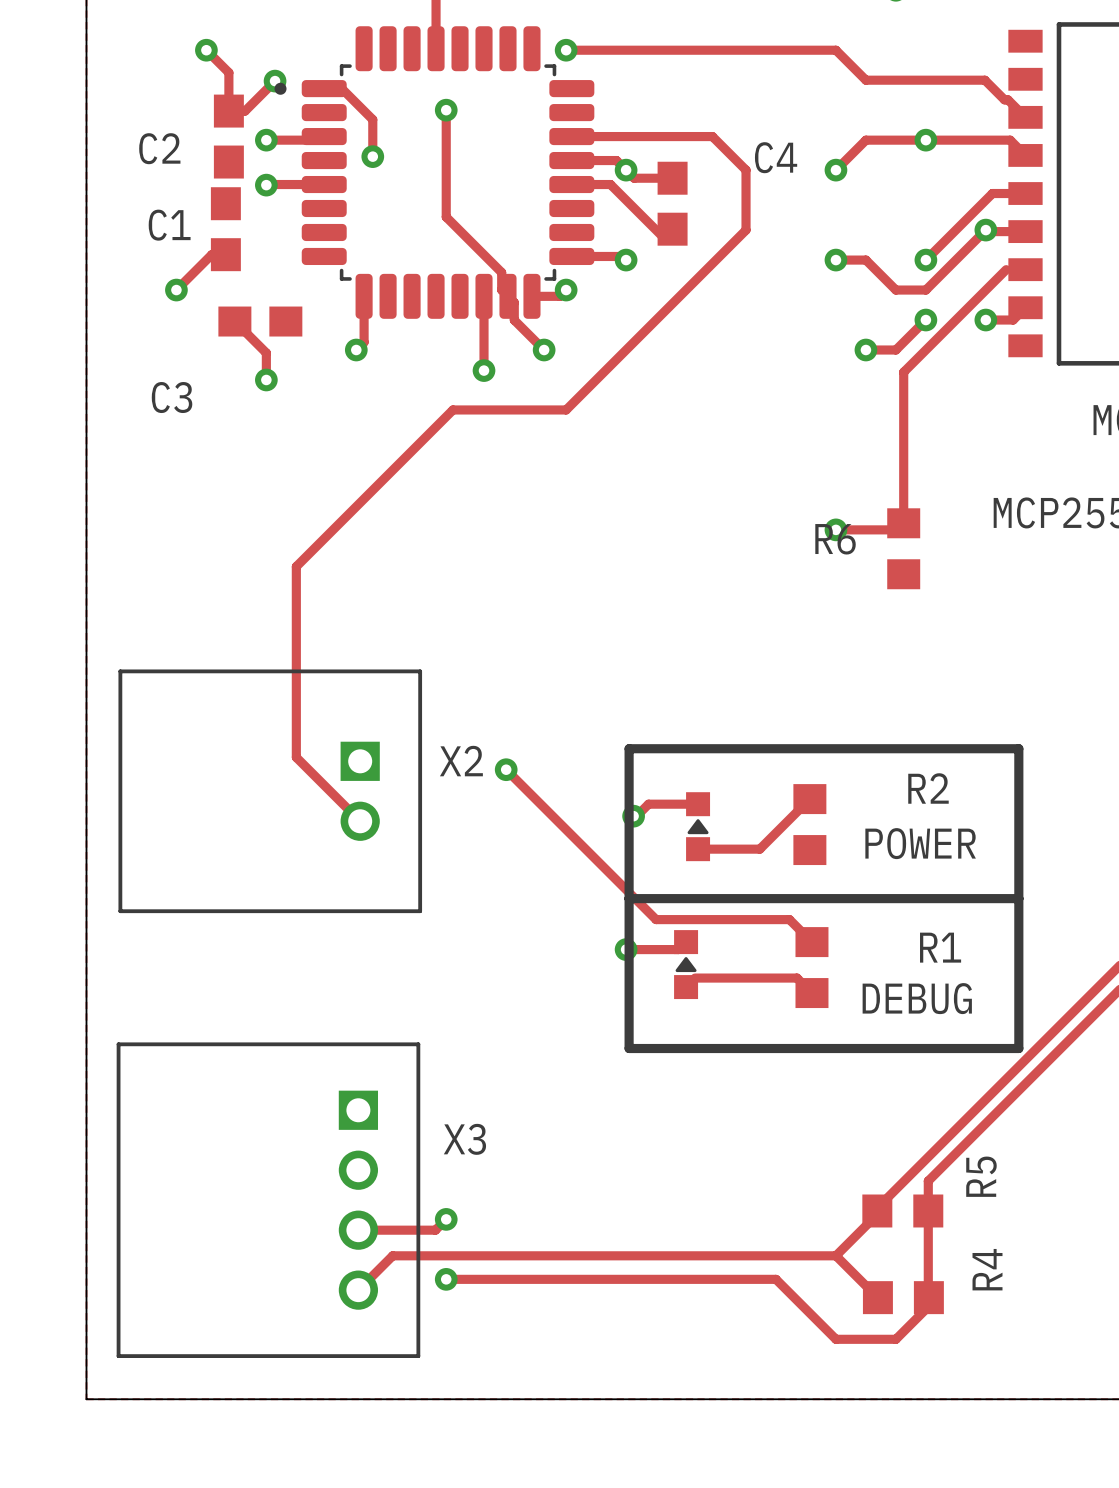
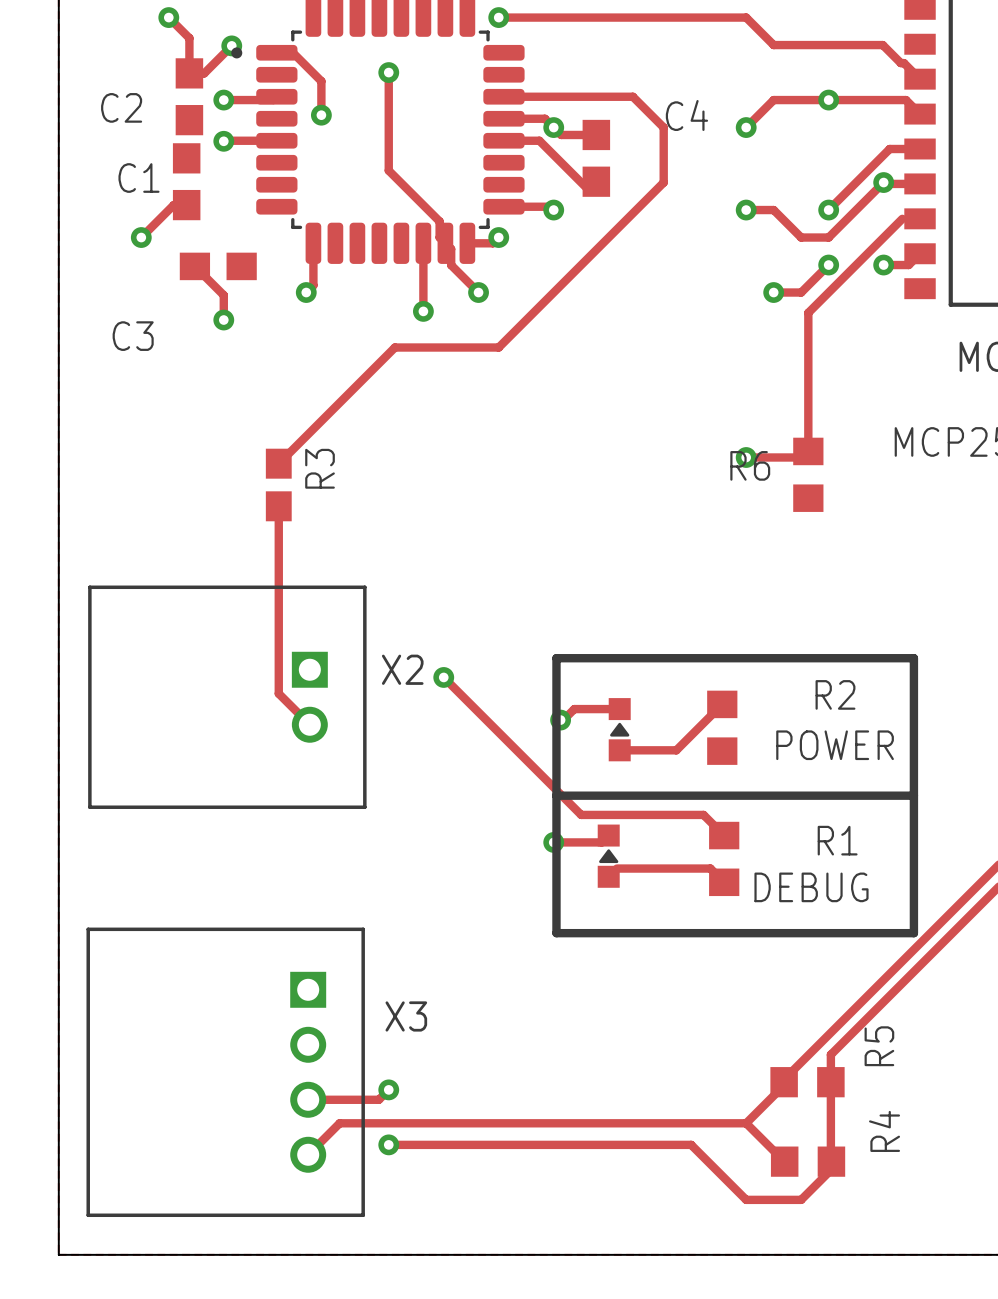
track: (326, 536) (296, 566) (296, 757) (326, 787) -> (278, 506) (278, 693)
R3: none -> (278, 484)

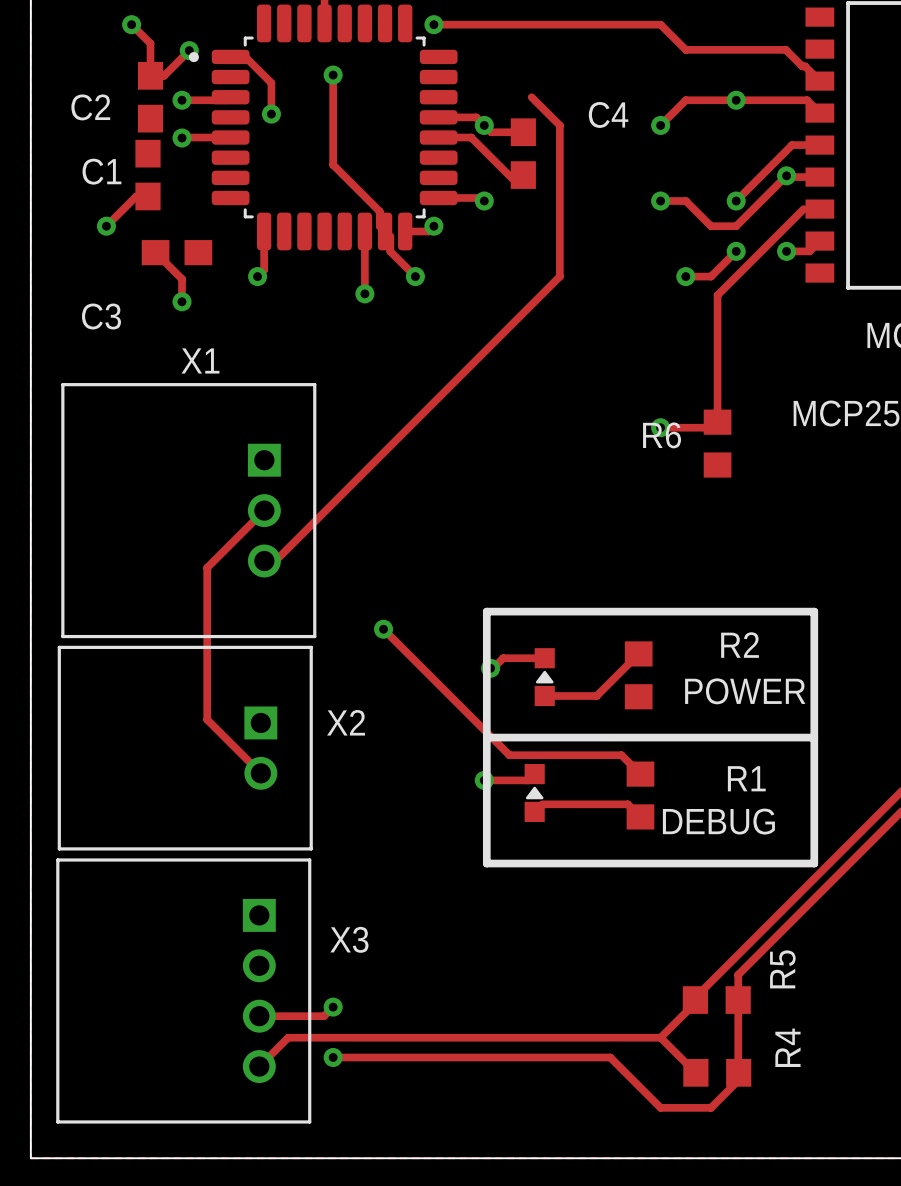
track: (503, 96) (632, 96) (663, 127) (663, 182) (498, 347) (394, 347) (278, 463) -> none
track: none -> (531, 97) (559, 125) (559, 276) (275, 560) (264, 560)
R3: (278, 484) -> none
track: (278, 506) (278, 693) (309, 724) -> none
X1: none -> (188, 510)
track: none -> (264, 510) (207, 567) (207, 719) (260, 773)
X2 position: (227, 697) -> (185, 748)

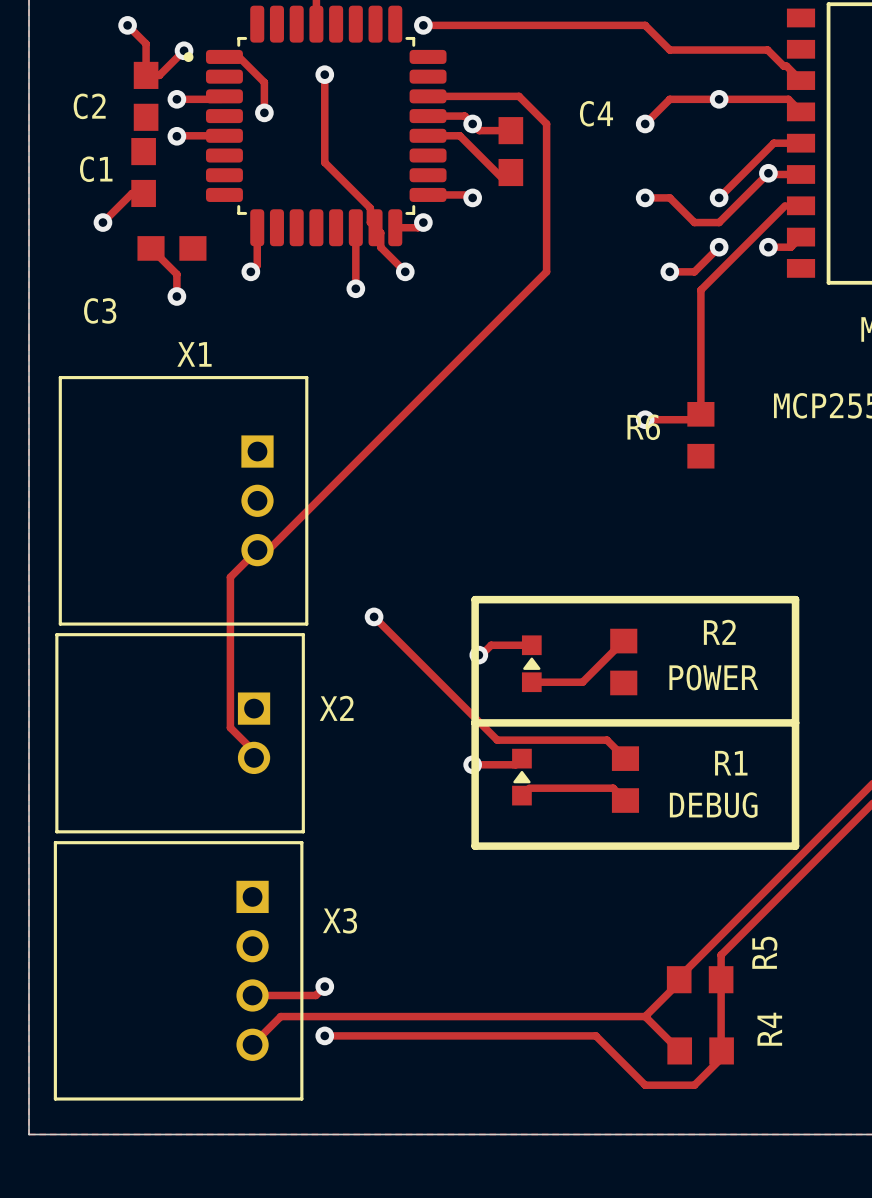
track: none -> (428, 96) (519, 96)
track: (264, 510) (207, 567) (207, 719) (260, 773) -> (257, 550) (230, 577) (230, 727) (254, 751) (254, 757)

